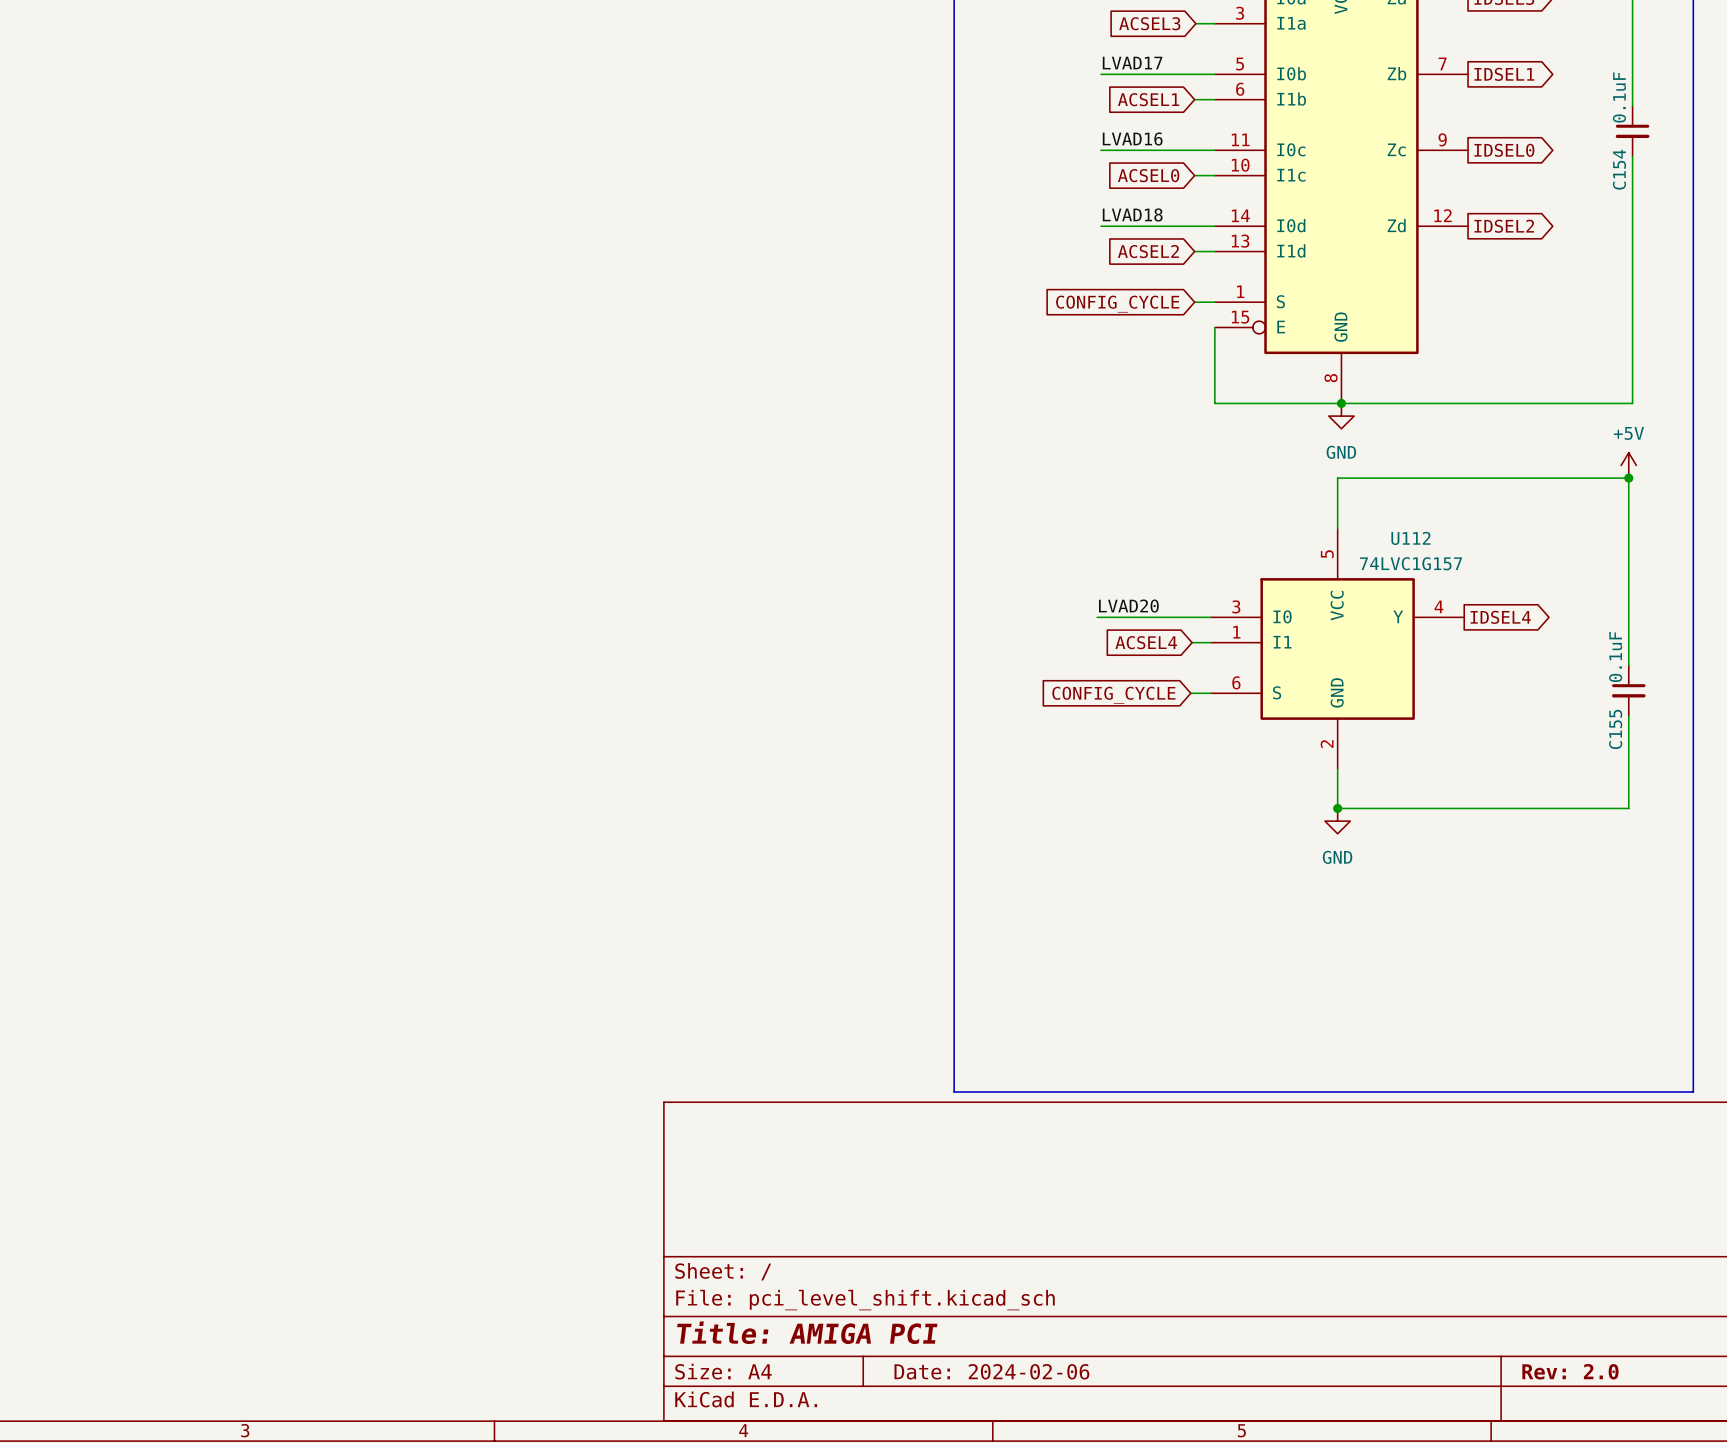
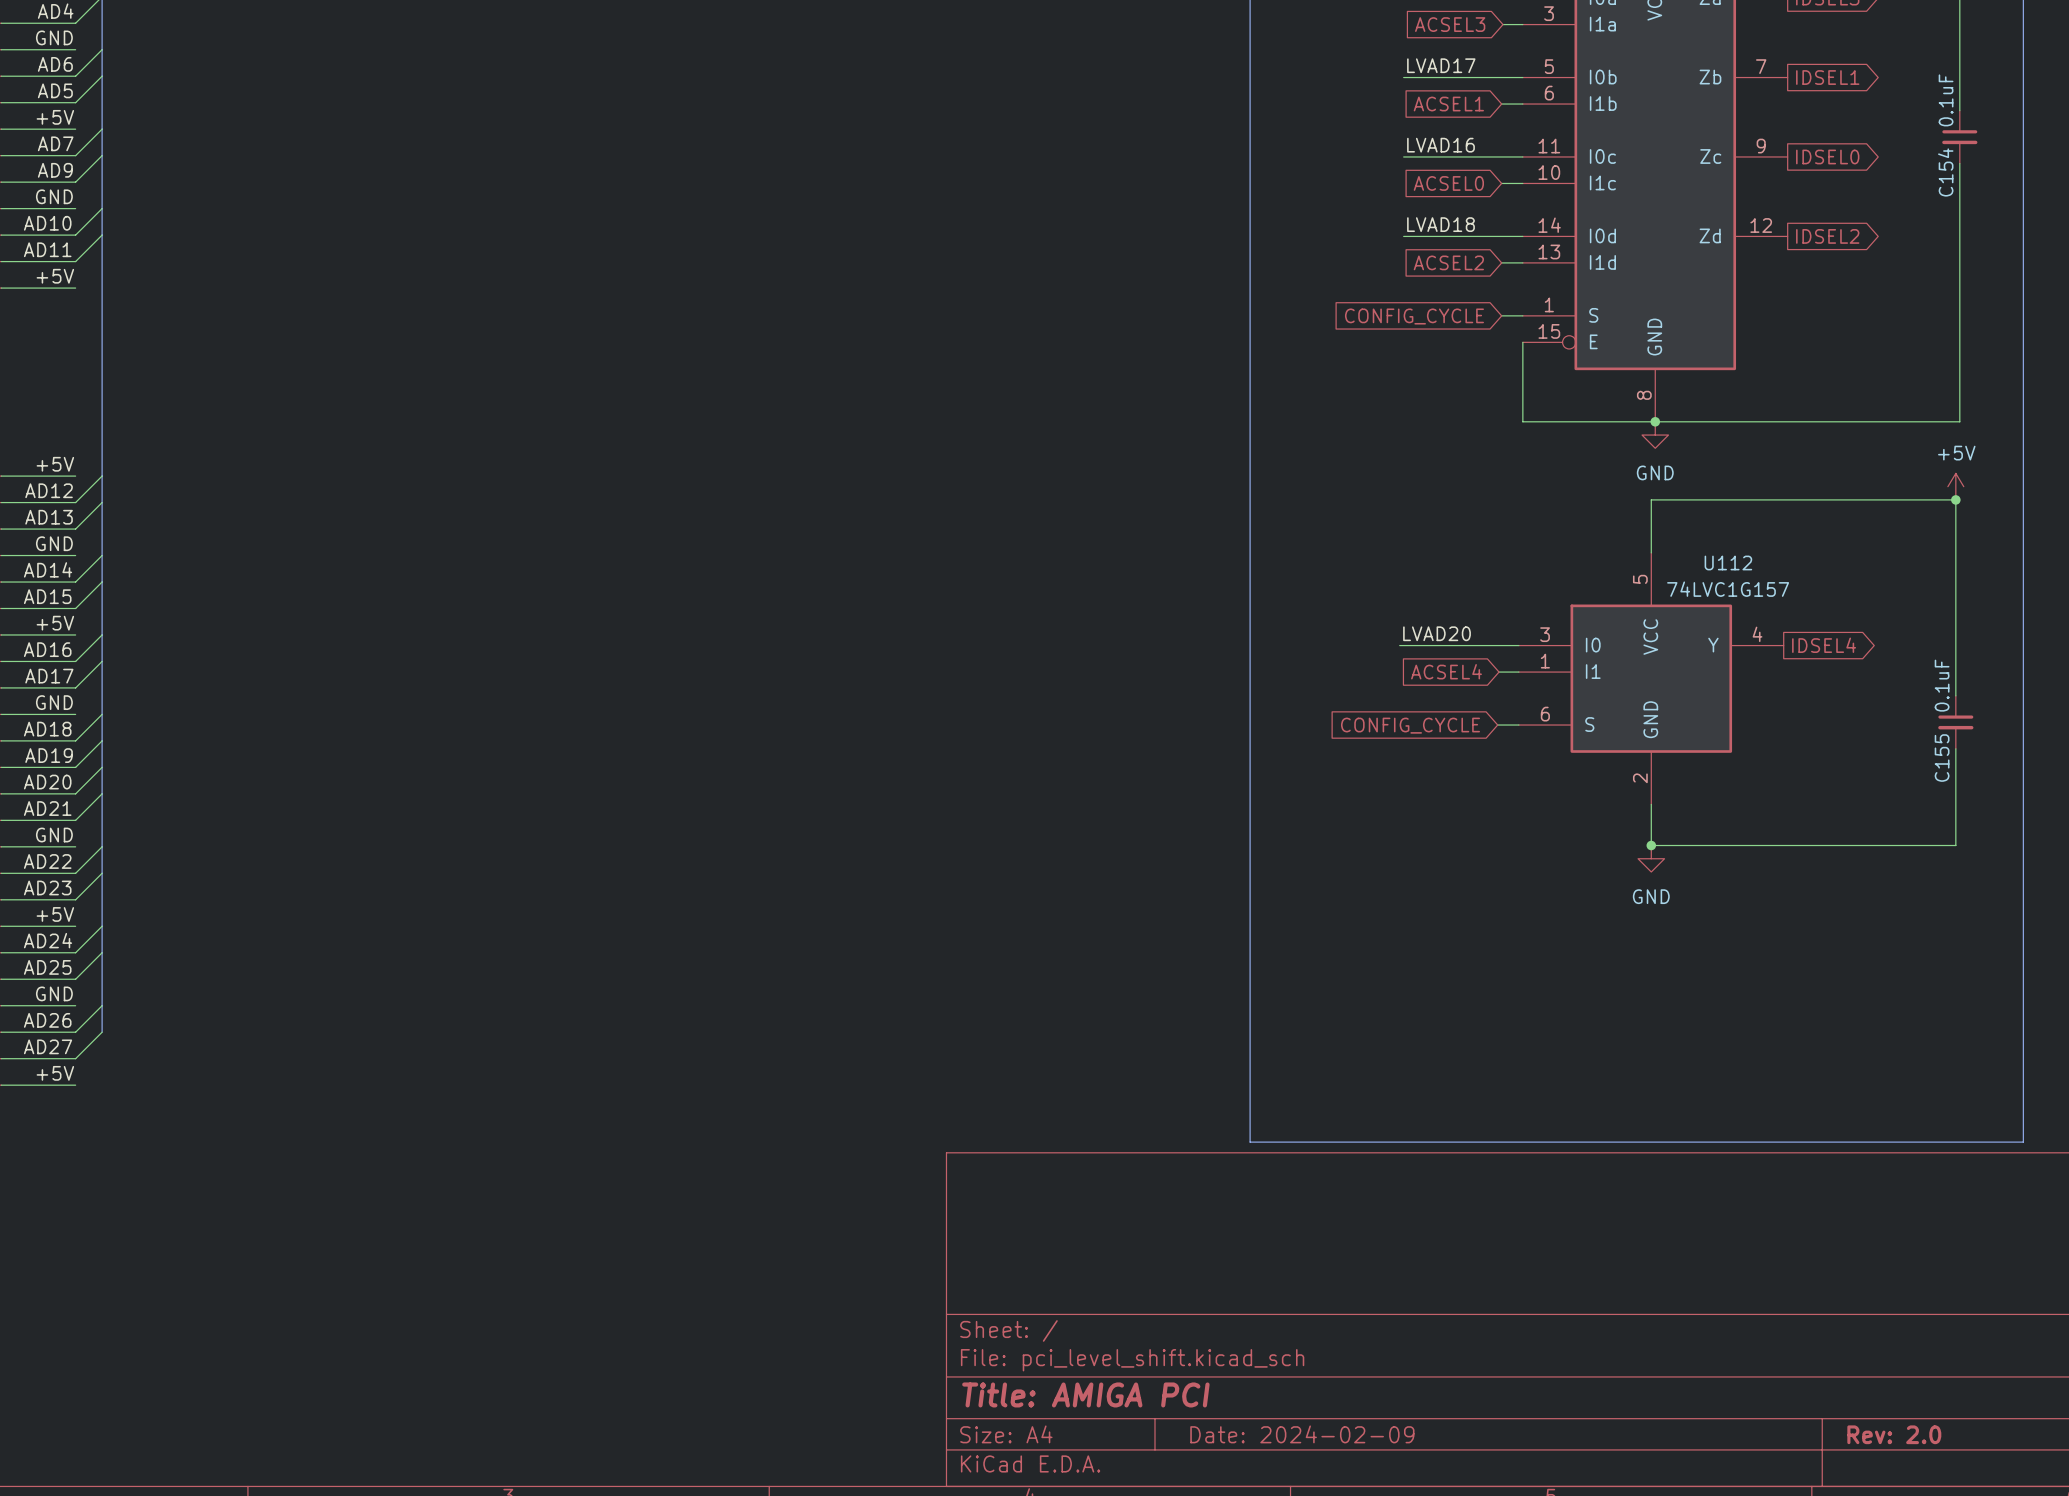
title block: Date: 2024-02-06 (991, 1371) -> Date: 2024-02-09 (1302, 1434)

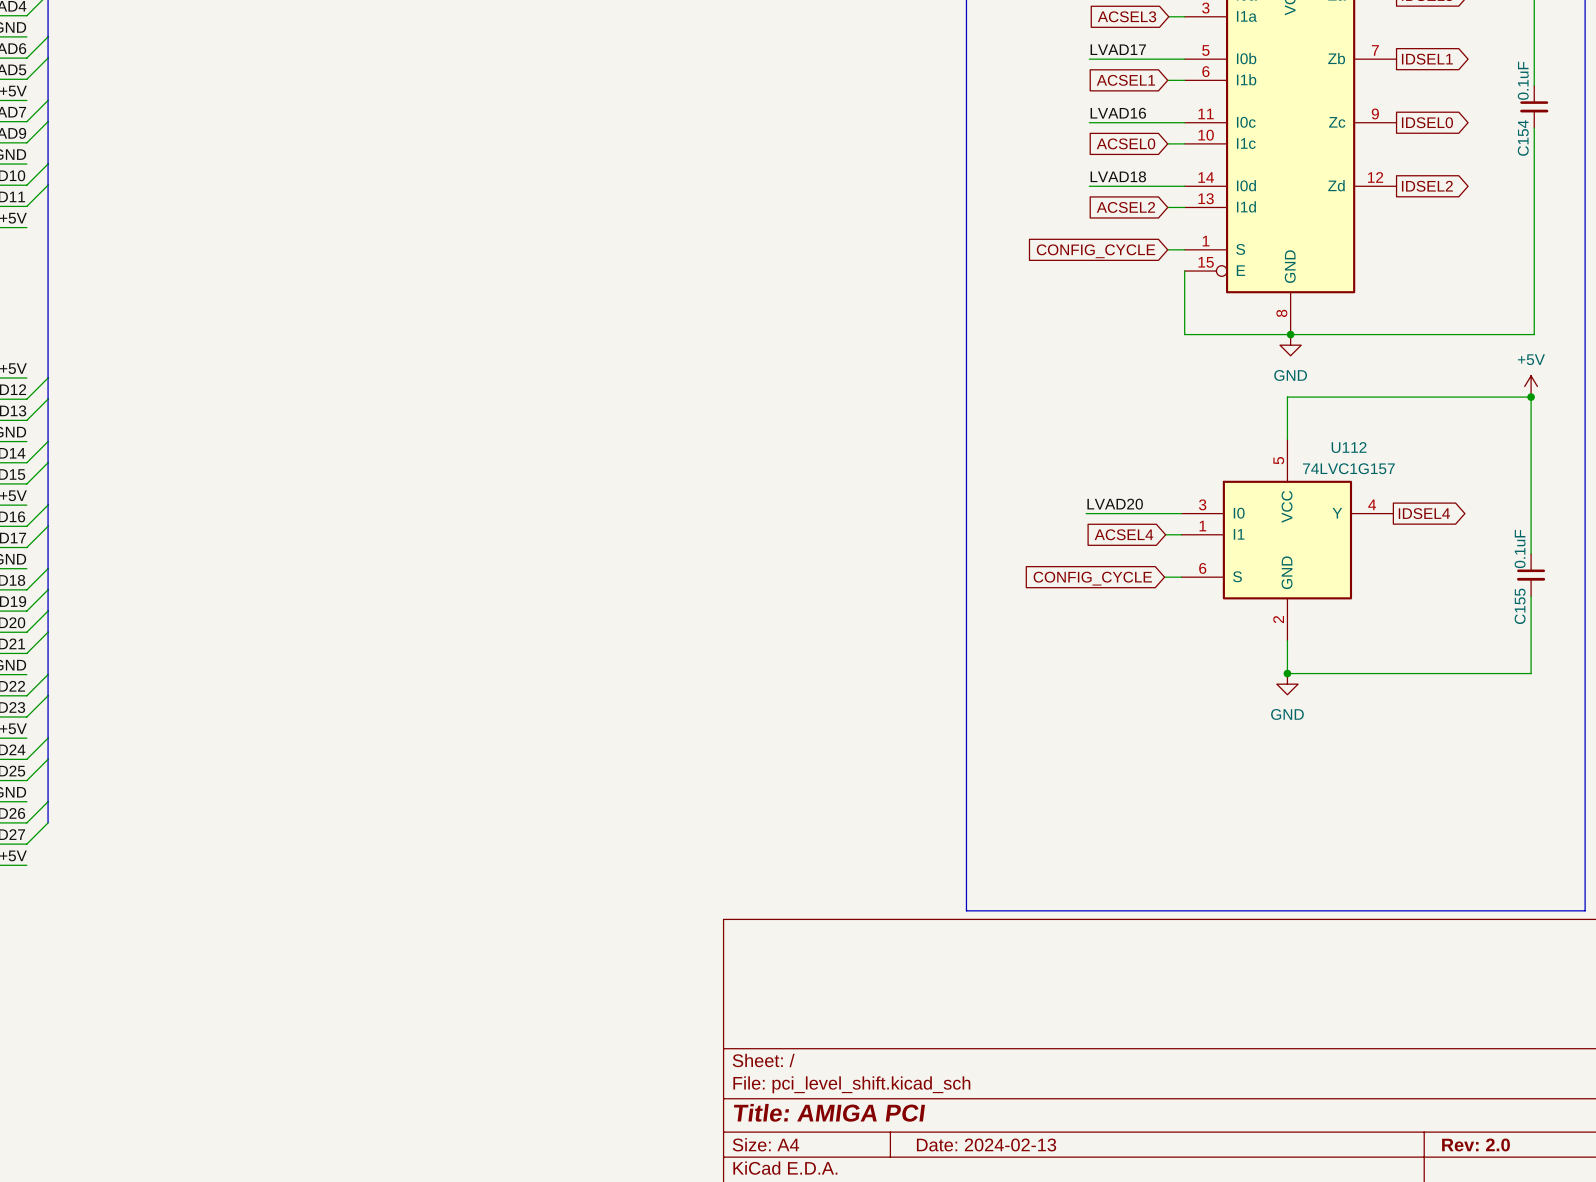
title block: Date: 2024-02-09 (1302, 1434) -> Date: 2024-02-13 (986, 1144)

